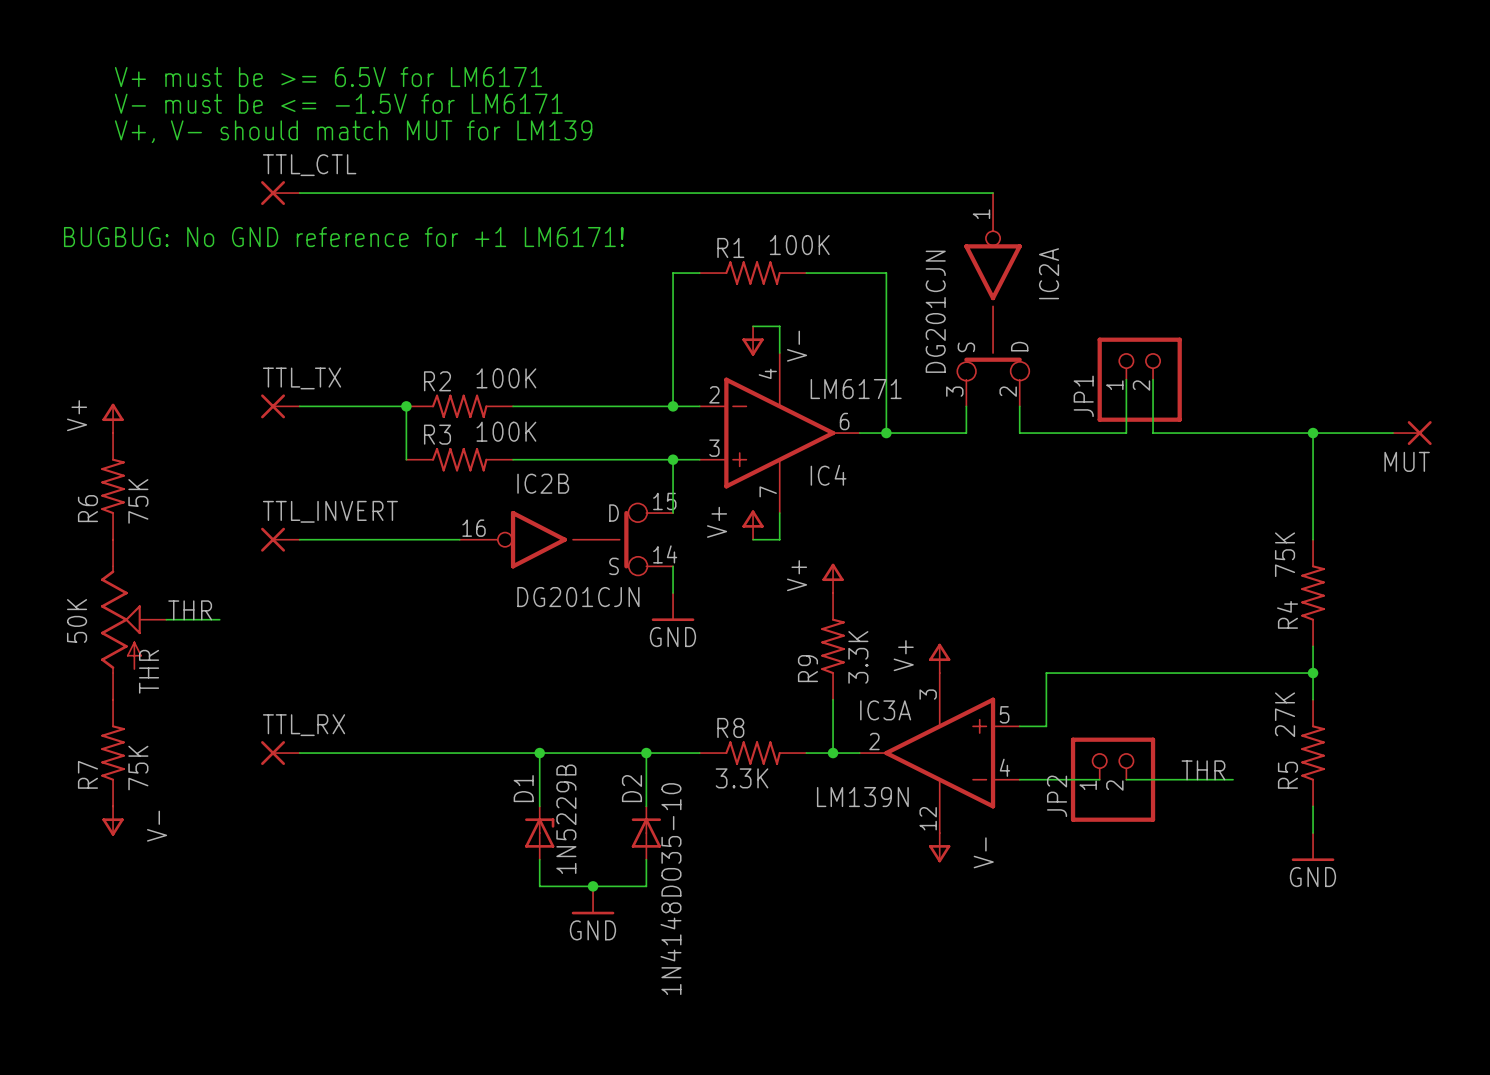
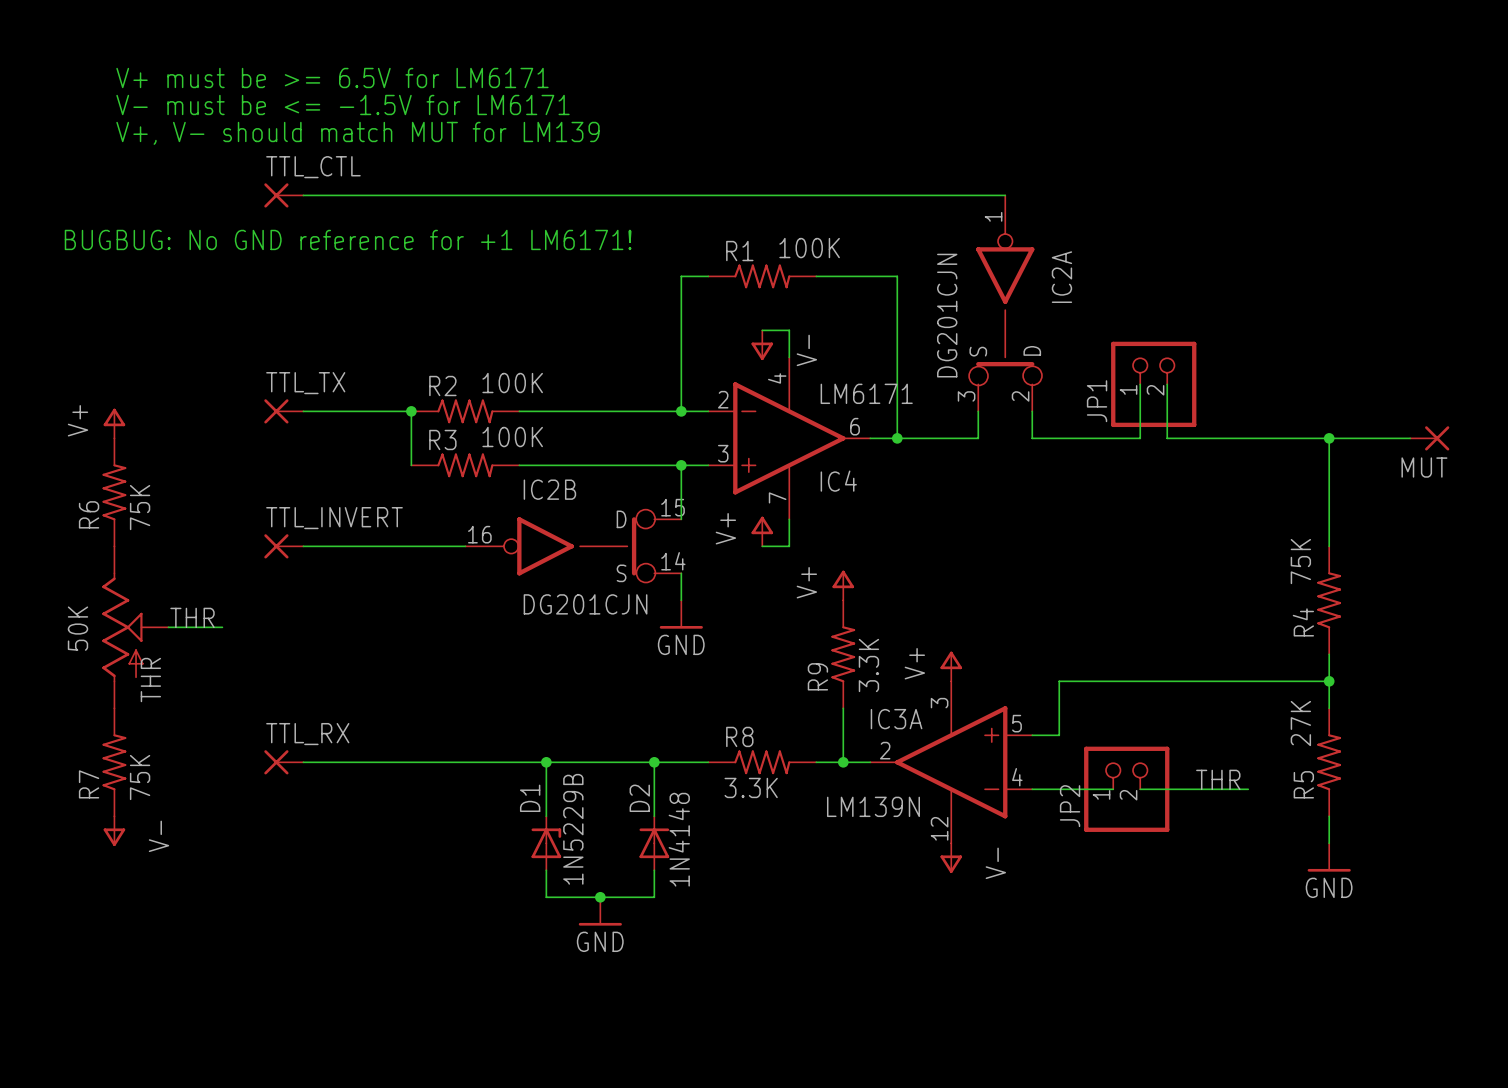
D2 value: 1N4148DO35-10 (671, 889) -> 1N4148 (679, 839)

